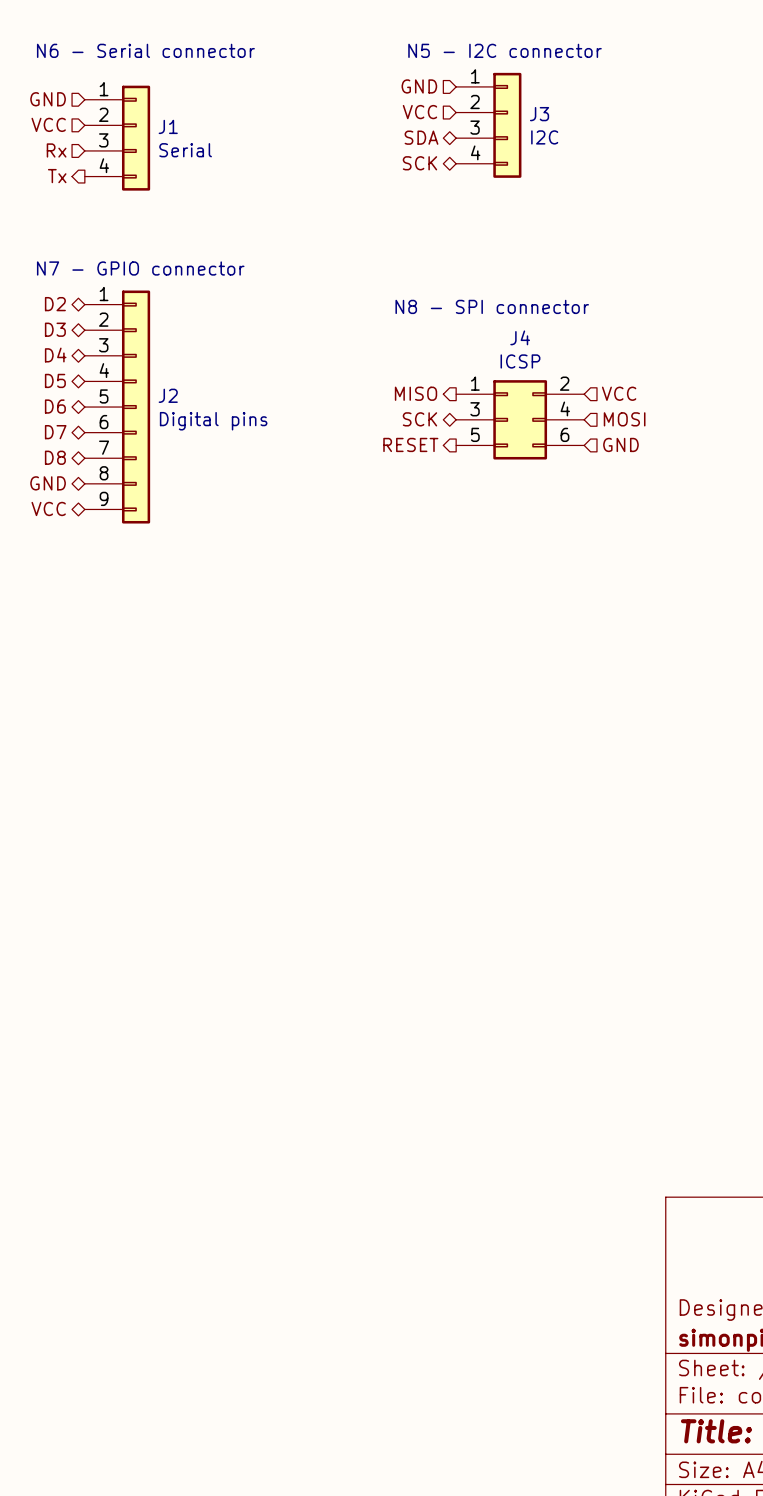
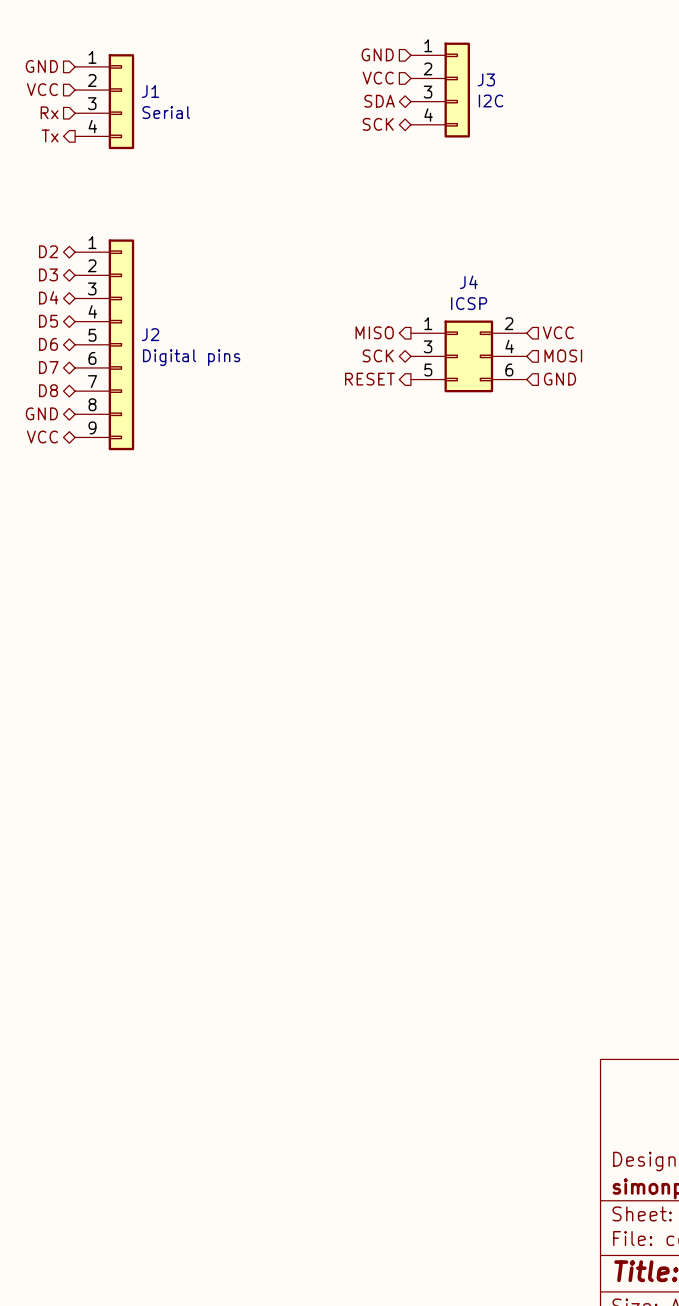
text: N6 - Serial connector (145, 50) -> none
text: N5 - I2C connector (505, 50) -> none
text: N7 - GPIO connector (140, 268) -> none
text: N8 - SPI connector (492, 306) -> none

